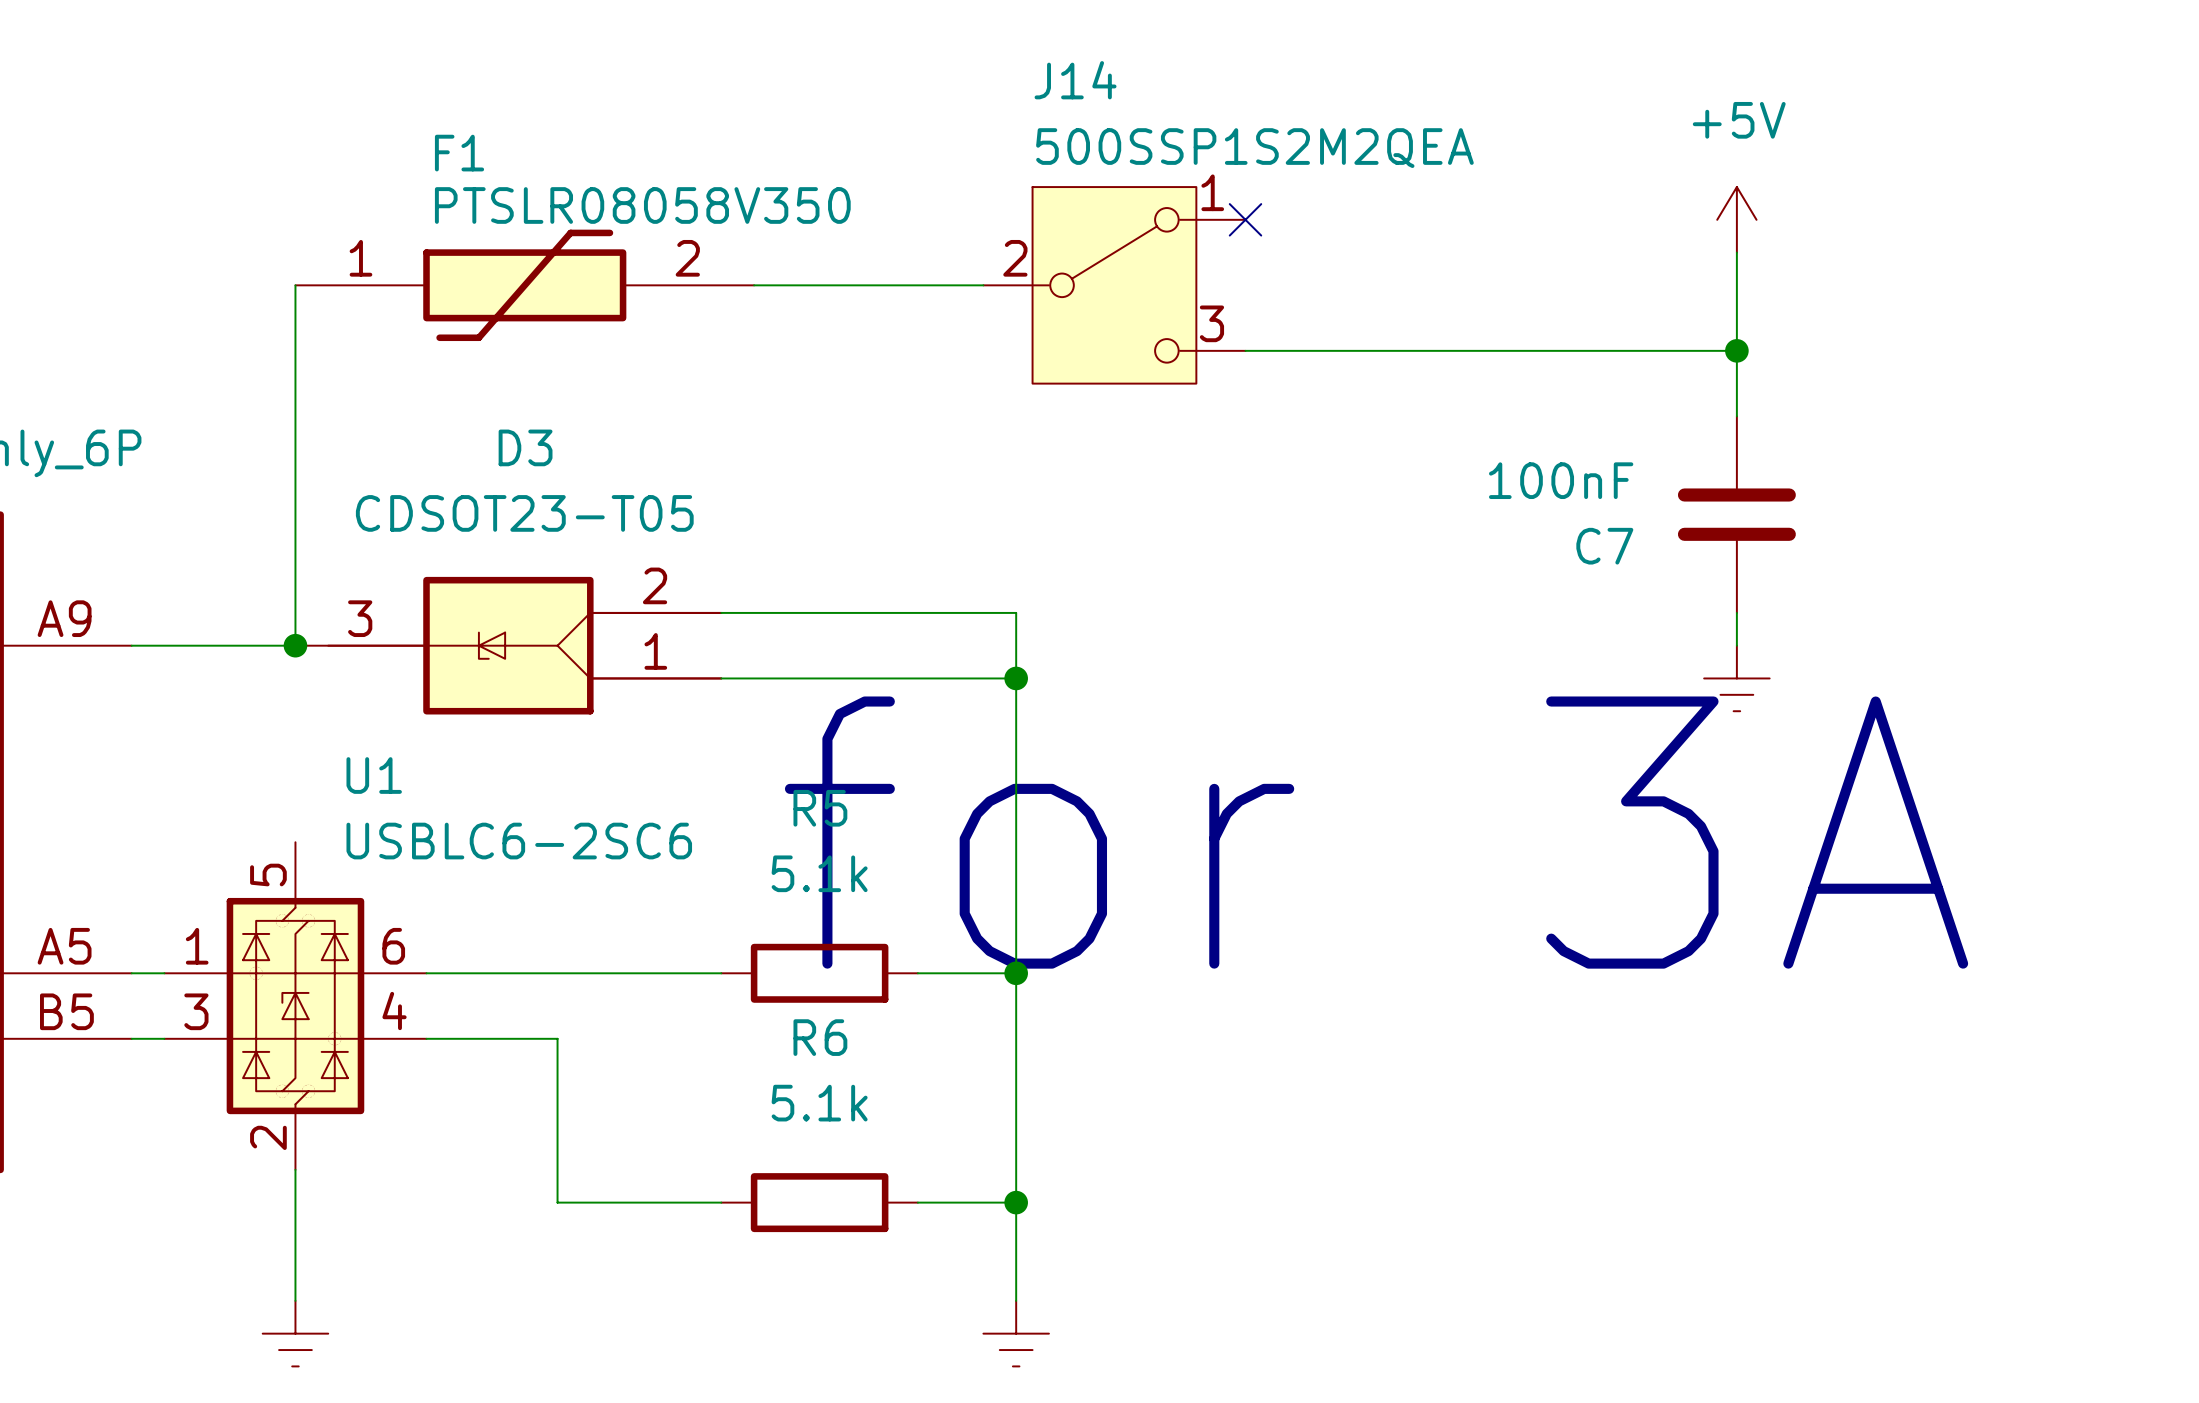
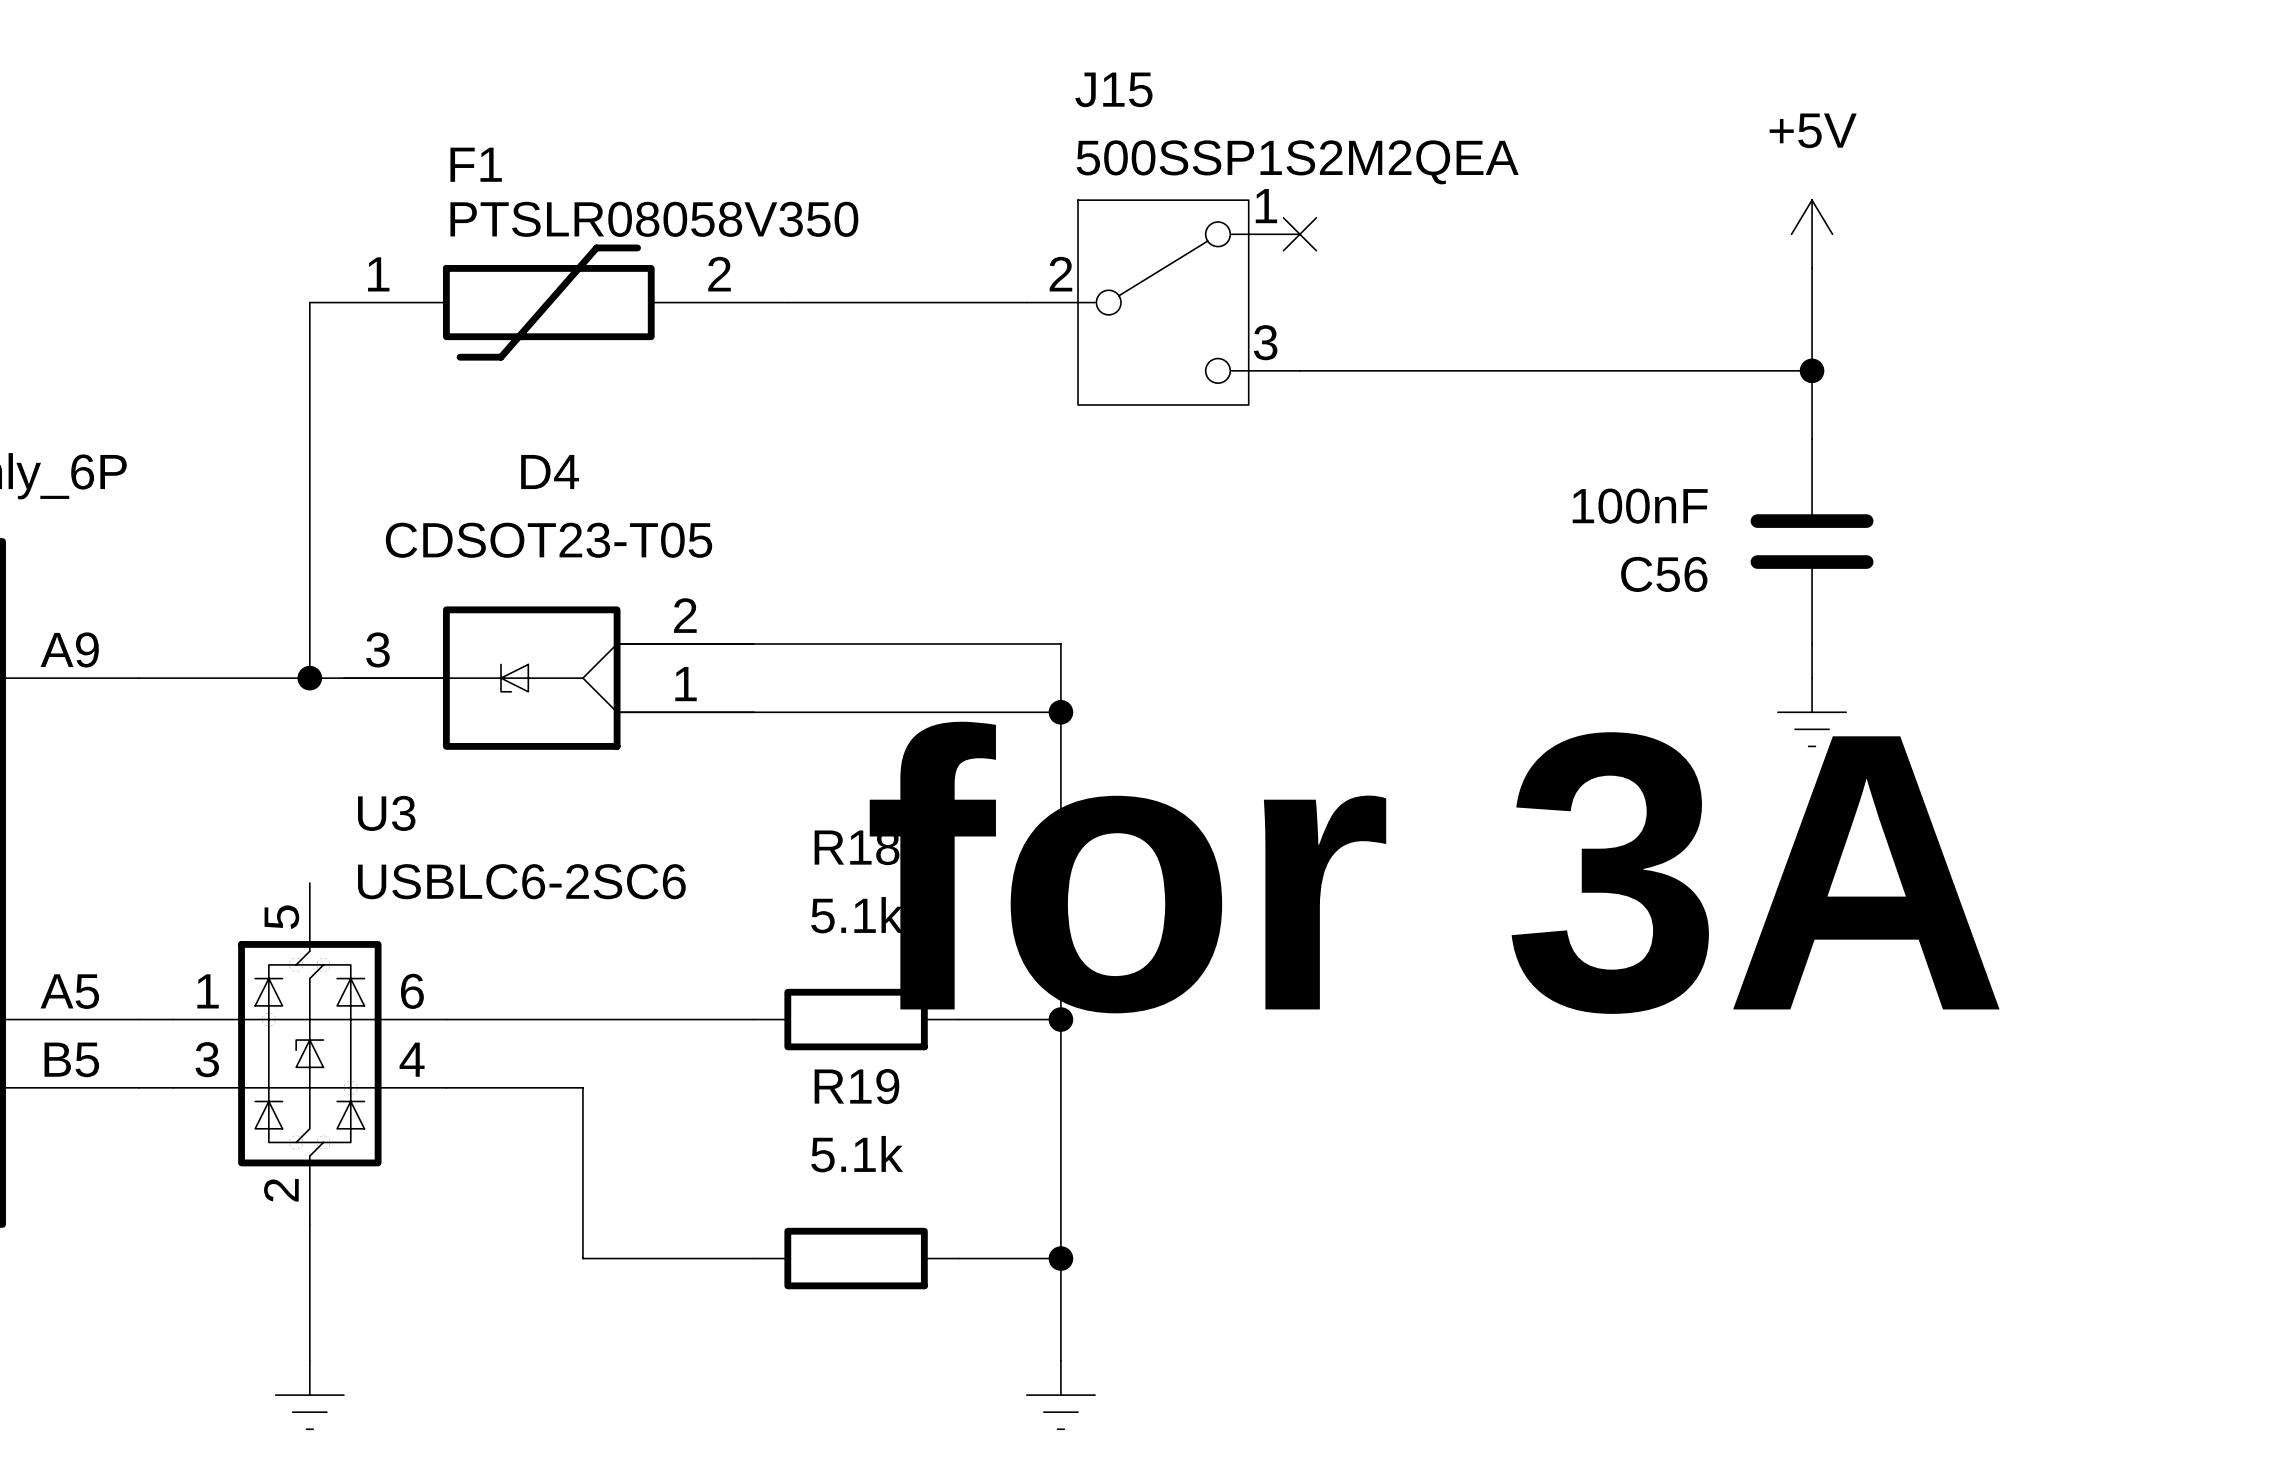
J14 name: J14 (1075, 80) -> J15 (1113, 89)
D3 name: D3 (525, 447) -> D4 (550, 472)
C7 name: C7 (1604, 546) -> C56 (1664, 574)
U1 name: U1 (374, 775) -> U3 (386, 813)
R5 name: R5 (820, 808) -> R18 (857, 847)
R6 name: R6 (820, 1037) -> R19 (856, 1086)

